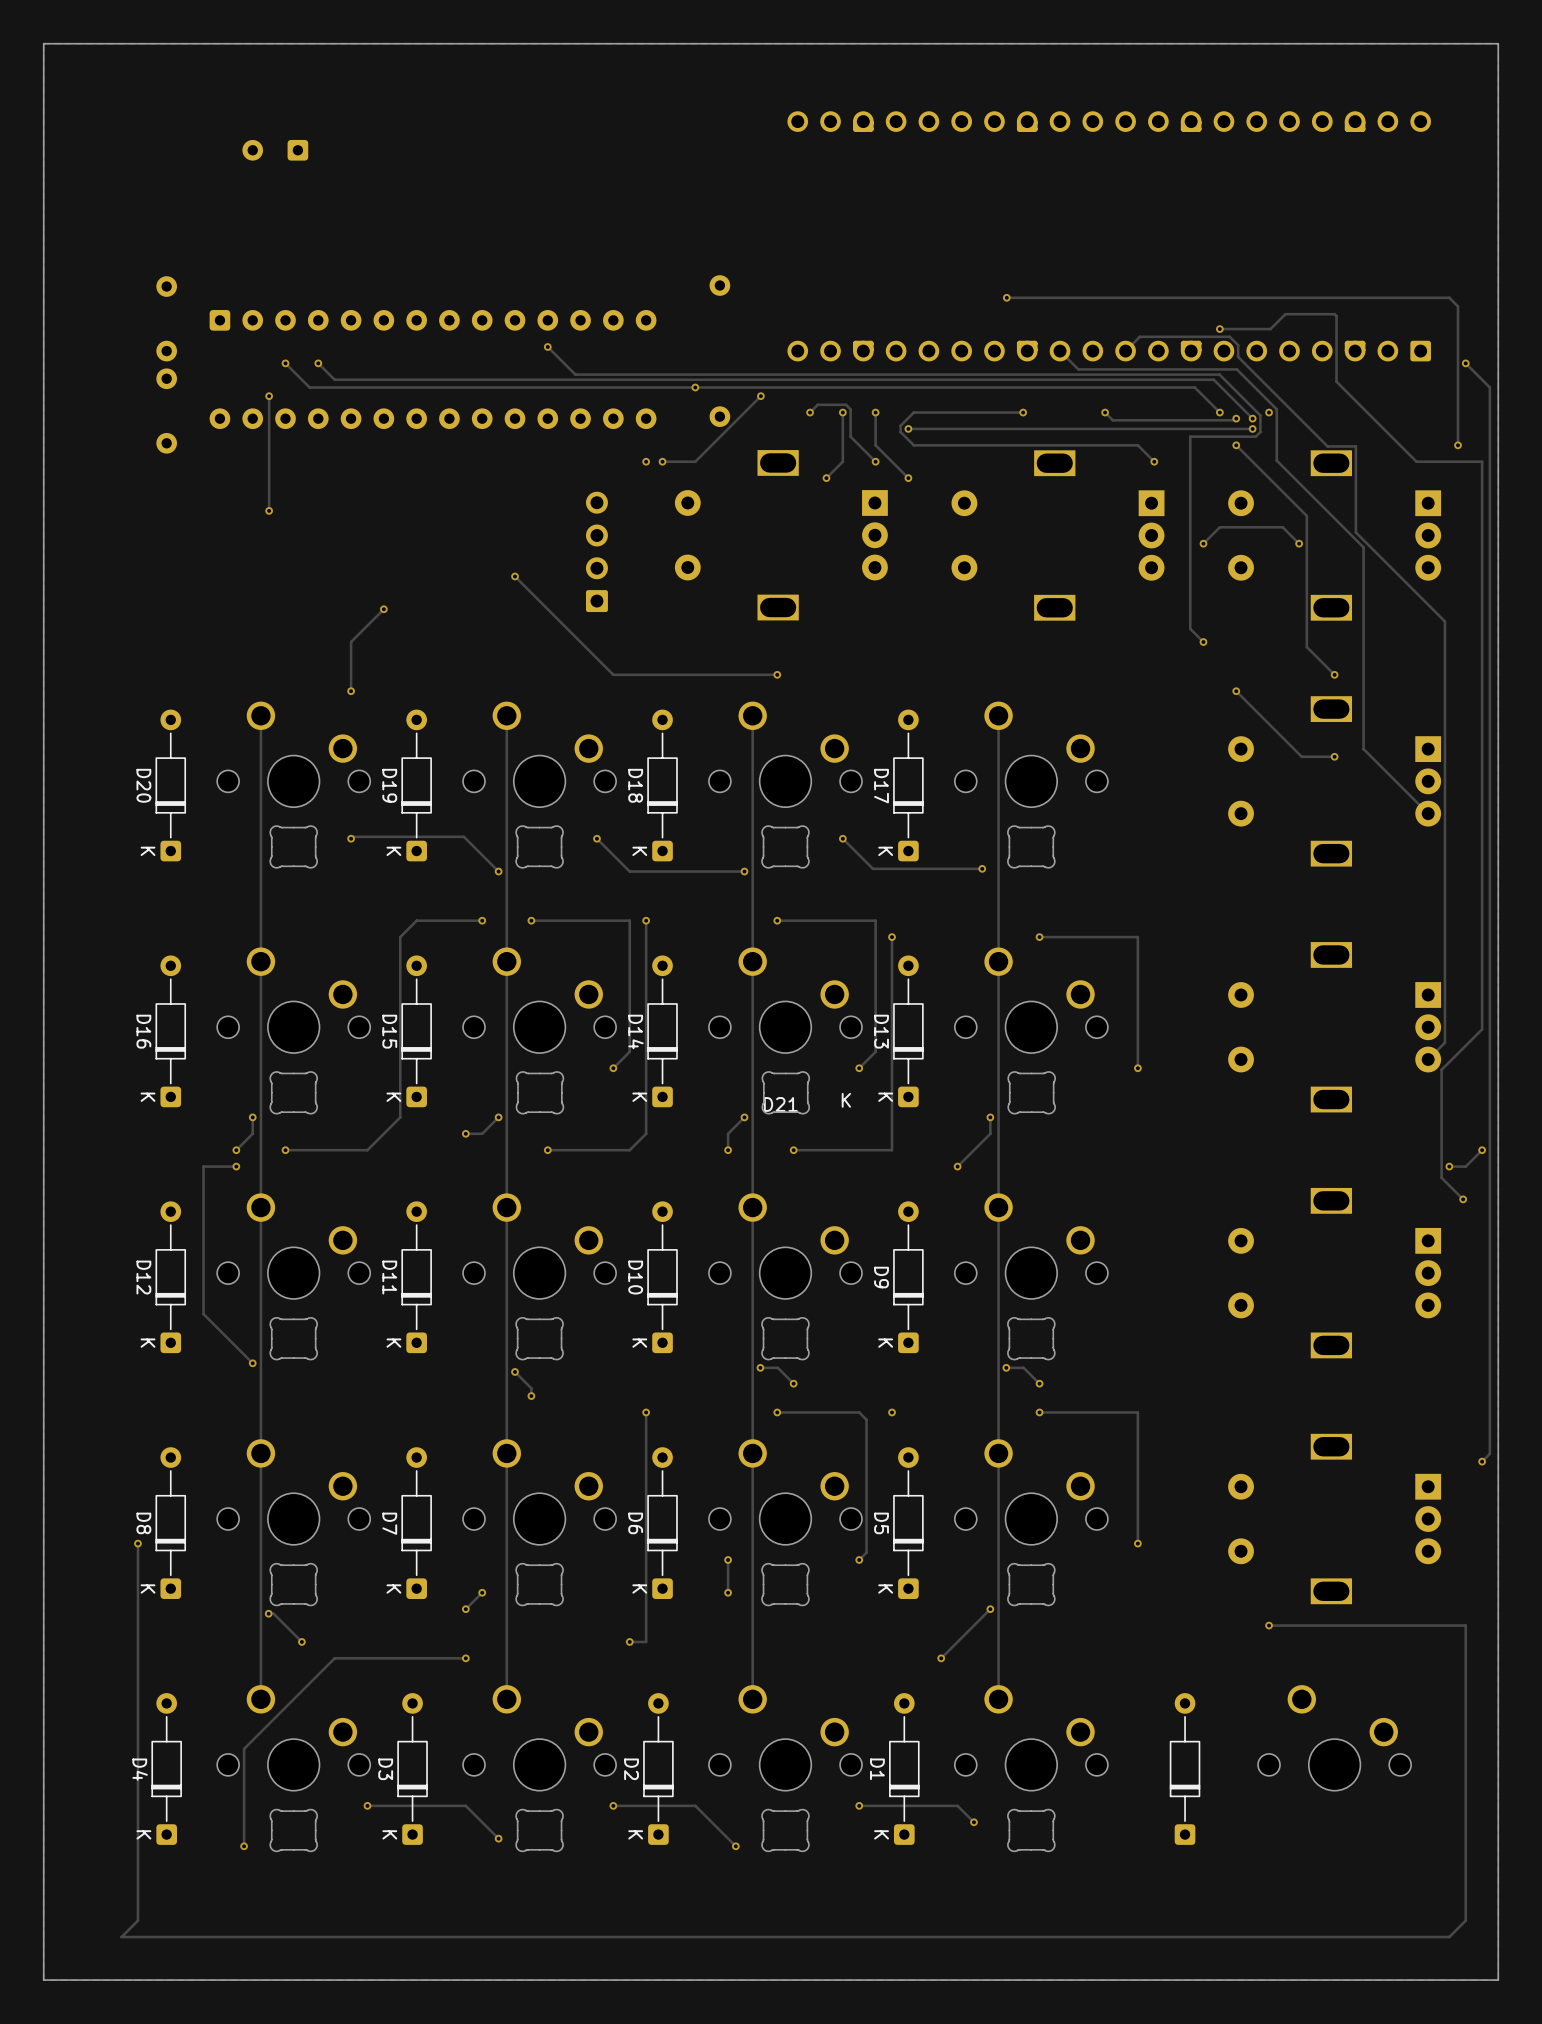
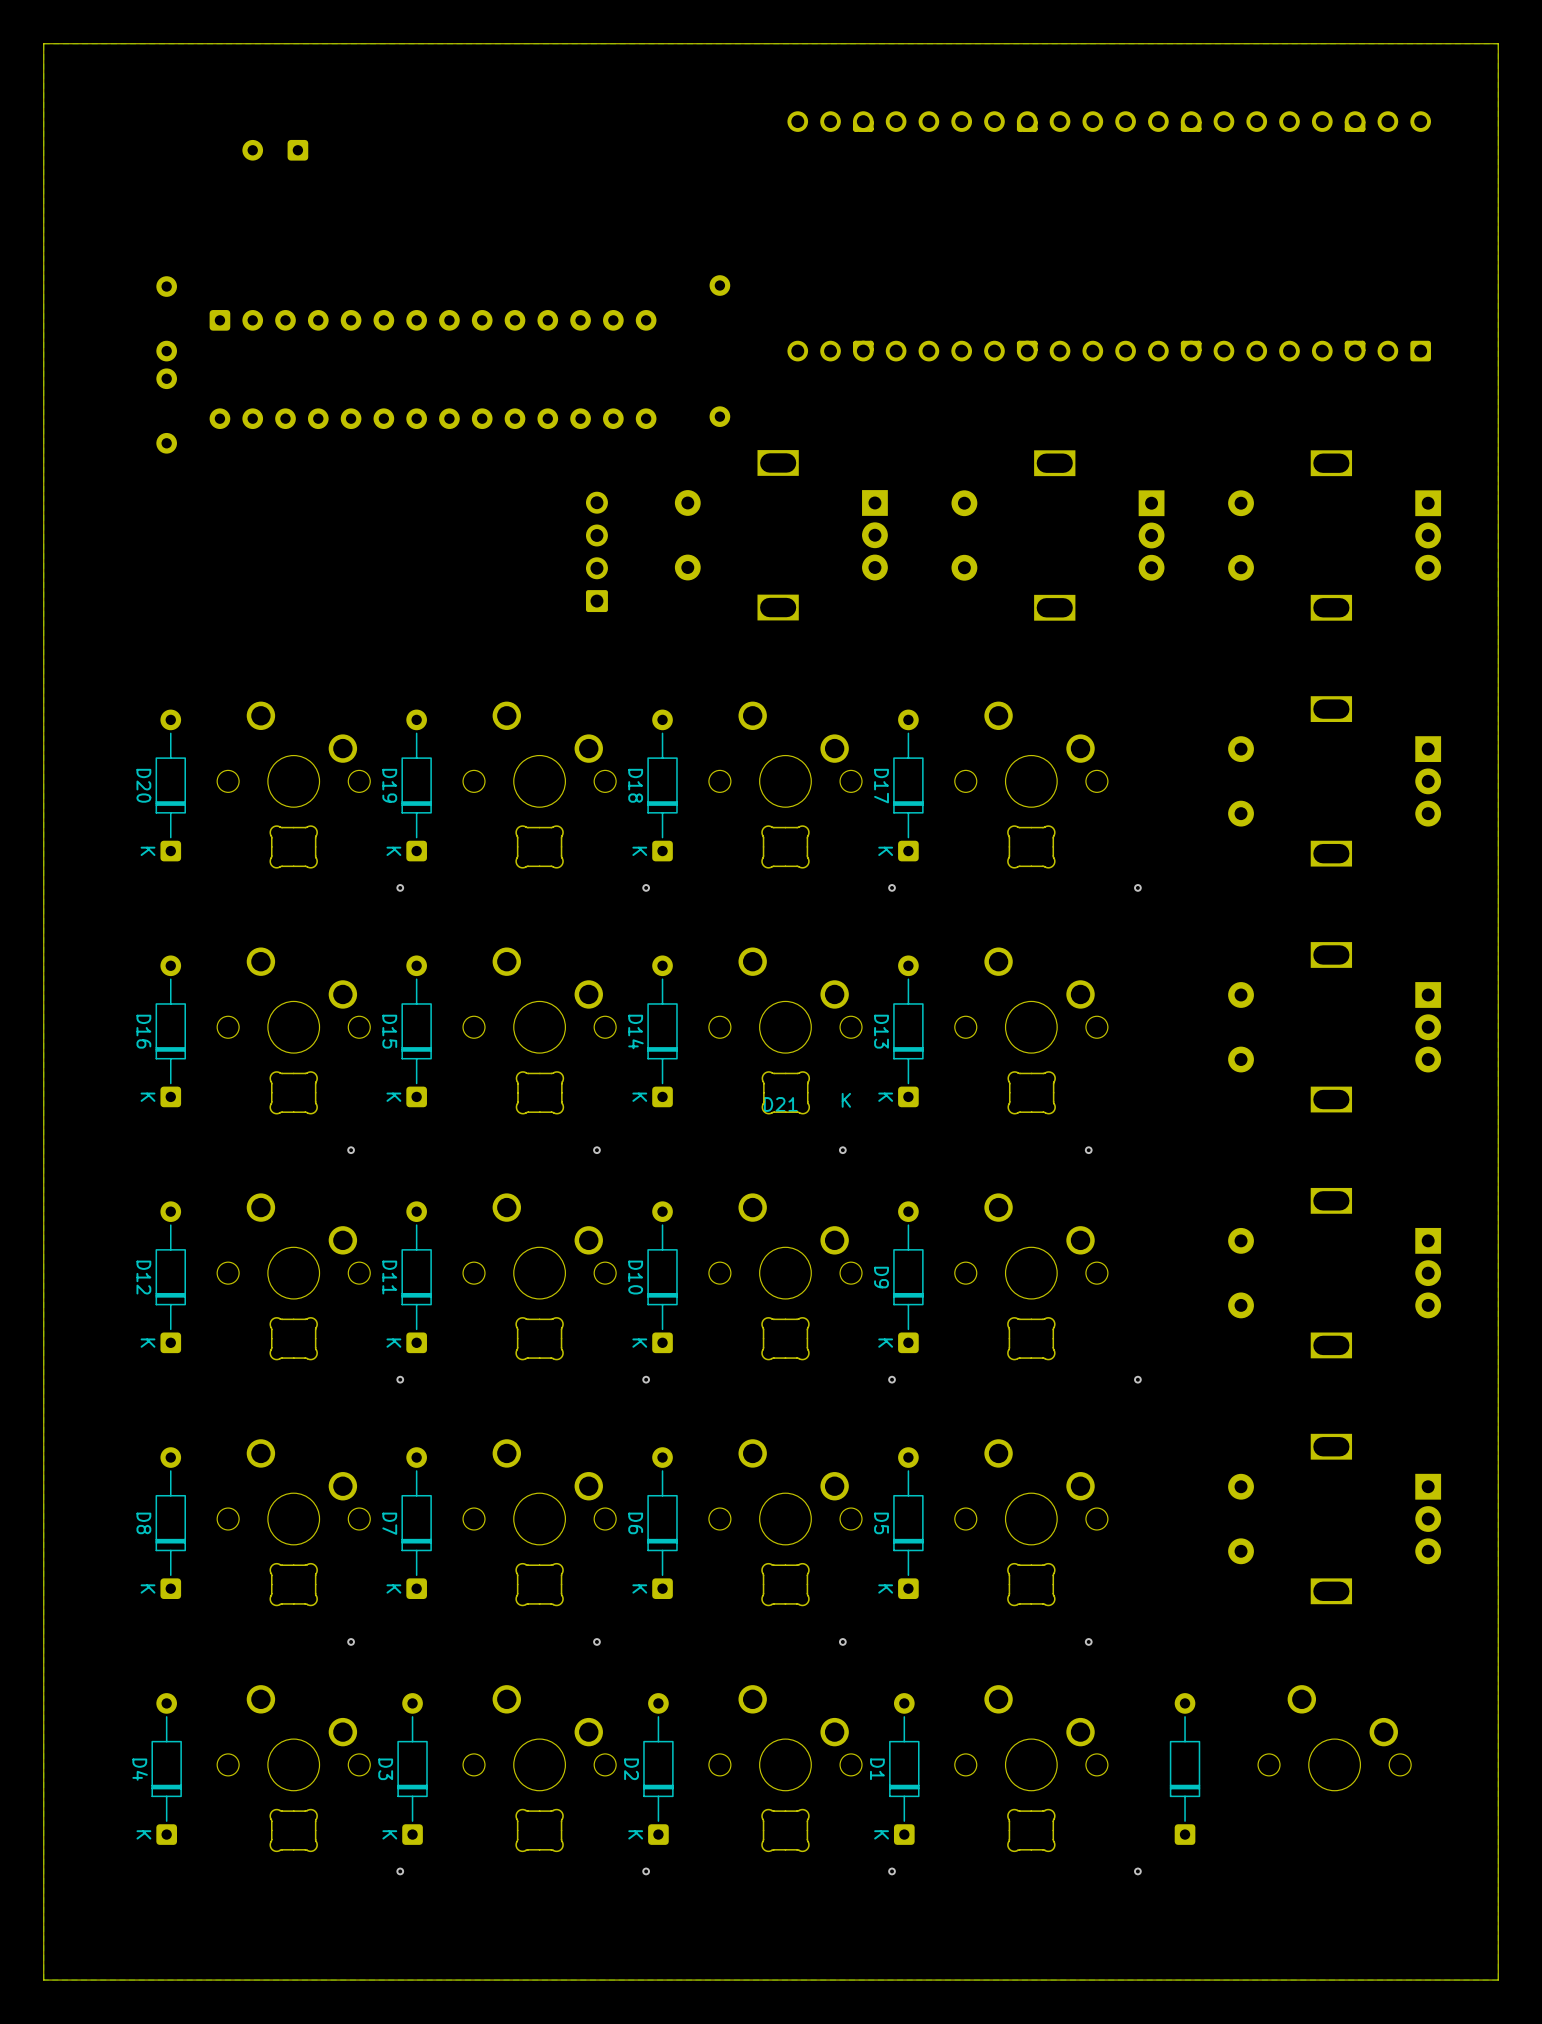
track: (1006, 297) (1449, 297) (1457, 306) (1457, 445) -> none
via: (1006, 297) -> none
track: (1219, 329) (1270, 329) (1285, 314) (1334, 314) (1336, 316) (1336, 381) (1416, 461) (1482, 461) (1482, 1029) (1441, 1069) (1441, 1177) (1463, 1199) -> none
via: (1219, 329) -> none
track: (547, 346) (575, 374) (1219, 374) (1260, 415) (1260, 432) (1255, 436) (1190, 436) (1190, 628) (1203, 642) -> none
via: (547, 346) -> none
track: (1060, 351) (1078, 369) (1236, 369) (1276, 409) (1276, 460) (1363, 547) (1363, 749) (1428, 813) -> none
track: (1125, 351) (1139, 336) (1229, 336) (1238, 345) (1238, 356) (1327, 446) (1355, 446) (1355, 532) (1444, 621) (1444, 1042) (1428, 1059) -> none
track: (285, 363) (309, 387) (1194, 387) (1219, 412) -> none
via: (285, 363) -> none
track: (318, 363) (334, 379) (1213, 379) (1252, 418) -> none
via: (318, 363) -> none
track: (1465, 363) (1489, 387) (1489, 1453) (1482, 1461) -> none
via: (1465, 363) -> none
via: (695, 387) -> none
track: (269, 396) (269, 510) -> none
via: (269, 396) -> none
track: (760, 396) (695, 461) (662, 461) -> none
via: (760, 396) -> none
track: (810, 412) (817, 404) (846, 404) (850, 409) (850, 436) (875, 461) -> none
via: (810, 412) -> none
track: (842, 412) (842, 461) (826, 478) -> none
via: (842, 412) -> none
track: (875, 412) (875, 445) (908, 478) -> none
via: (875, 412) -> none
track: (1023, 412) (913, 412) (900, 425) (900, 432) (913, 445) (1137, 445) (1154, 461) -> none
via: (1023, 412) -> none
track: (1105, 412) (1112, 420) (1234, 420) (1236, 418) -> none
via: (1105, 412) -> none
via: (1219, 412) -> none
via: (1269, 412) -> none
via: (1236, 418) -> none
via: (1252, 418) -> none
via: (908, 428) -> none
track: (1252, 428) (908, 428) -> none
via: (1252, 428) -> none
track: (1236, 445) (1306, 515) (1306, 647) (1334, 674) -> none
via: (1236, 445) -> none
via: (1457, 445) -> none
via: (646, 461) -> none
via: (662, 461) -> none
via: (875, 461) -> none
via: (1154, 461) -> none
via: (826, 478) -> none
via: (908, 478) -> none
via: (269, 510) -> none
via: (1203, 543) -> none
track: (1299, 543) (1282, 527) (1219, 527) (1203, 543) -> none
via: (1299, 543) -> none
track: (515, 576) (613, 674) (777, 674) -> none
via: (515, 576) -> none
track: (383, 609) (351, 642) (351, 691) -> none
via: (383, 609) -> none
via: (1203, 642) -> none
via: (777, 674) -> none
via: (1334, 674) -> none
via: (351, 691) -> none
track: (1236, 691) (1301, 756) (1334, 756) -> none
via: (1236, 691) -> none
track: (260, 714) (260, 1699) -> none
track: (506, 715) (506, 1699) -> none
track: (752, 715) (752, 1699) -> none
track: (998, 715) (998, 1699) -> none
via: (1334, 756) -> none
track: (351, 838) (352, 836) (463, 836) (498, 871) -> none
via: (351, 838) -> none
track: (596, 838) (629, 871) (744, 871) -> none
via: (596, 838) -> none
track: (842, 838) (872, 868) (982, 868) -> none
via: (842, 838) -> none
via: (982, 868) -> none
via: (498, 871) -> none
via: (744, 871) -> none
via: none -> (400, 887)
via: none -> (892, 887)
via: none -> (1137, 887)
track: (482, 920) (416, 920) (400, 937) (400, 1117) (367, 1150) (285, 1150) -> none
via: (482, 920) -> none
track: (531, 920) (629, 920) (629, 1051) (613, 1068) -> none
via: (531, 920) -> none
track: (646, 920) (646, 1133) (629, 1150) (547, 1150) -> none
via position: (646, 920) -> (646, 887)
track: (777, 920) (875, 920) (875, 1051) (859, 1068) -> none
via: (777, 920) -> none
track: (892, 937) (892, 1150) (793, 1150) -> none
via: (892, 937) -> none
track: (1039, 937) (1137, 937) (1137, 1068) -> none
via: (1039, 937) -> none
via: (613, 1068) -> none
via: (859, 1068) -> none
via: (1137, 1068) -> none
track: (252, 1117) (252, 1133) (236, 1150) -> none
via: (252, 1117) -> none
track: (498, 1117) (482, 1133) (465, 1133) -> none
via: (498, 1117) -> none
track: (744, 1117) (728, 1133) (728, 1150) -> none
via: (744, 1117) -> none
track: (990, 1117) (990, 1133) (957, 1166) -> none
via: (990, 1117) -> none
via: (465, 1133) -> none
via: (236, 1150) -> none
via: (285, 1150) -> none
via: none -> (351, 1150)
via: (547, 1150) -> none
via: none -> (596, 1150)
via: (728, 1150) -> none
via: (793, 1150) -> none
via: none -> (842, 1150)
via: none -> (1088, 1150)
track: (1482, 1150) (1465, 1166) (1449, 1166) -> none
via: (1482, 1150) -> none
track: (236, 1166) (203, 1166) (203, 1314) (252, 1363) -> none
via: (236, 1166) -> none
via: (957, 1166) -> none
via: (1449, 1166) -> none
via: (1463, 1199) -> none
via: (252, 1363) -> none
track: (760, 1367) (777, 1367) (793, 1383) -> none
via: (760, 1367) -> none
track: (1006, 1367) (1023, 1367) (1039, 1383) -> none
via: (1006, 1367) -> none
track: (515, 1371) (531, 1388) (531, 1396) -> none
via: (515, 1371) -> none
via: none -> (400, 1379)
via: none -> (1137, 1379)
via: (793, 1383) -> none
via: (1039, 1383) -> none
via: (531, 1396) -> none
track: (646, 1412) (646, 1641) (629, 1641) -> none
via position: (646, 1412) -> (646, 1379)
track: (777, 1412) (859, 1412) (866, 1419) (866, 1552) (859, 1559) -> none
via: (777, 1412) -> none
via position: (892, 1412) -> (892, 1379)
track: (1039, 1412) (1137, 1412) (1137, 1543) -> none
via: (1039, 1412) -> none
via: (1482, 1461) -> none
track: (137, 1543) (137, 1920) (121, 1937) (1449, 1937) (1465, 1920) (1465, 1625) (1269, 1625) -> none
via: (137, 1543) -> none
via: (1137, 1543) -> none
track: (728, 1559) (728, 1592) -> none
via: (728, 1559) -> none
via: (859, 1559) -> none
track: (482, 1592) (465, 1609) -> none
via: (482, 1592) -> none
via: (728, 1592) -> none
via: (465, 1609) -> none
track: (990, 1609) (941, 1658) -> none
via: (990, 1609) -> none
track: (268, 1613) (273, 1613) (301, 1641) -> none
via: (268, 1613) -> none
via: (1269, 1625) -> none
via: (301, 1641) -> none
via: none -> (351, 1641)
via position: (629, 1641) -> (596, 1641)
via: none -> (842, 1641)
via: none -> (1088, 1641)
track: (465, 1658) (334, 1658) (244, 1748) (244, 1846) -> none
via: (465, 1658) -> none
via: (941, 1658) -> none
track: (367, 1805) (465, 1805) (498, 1838) -> none
via: (367, 1805) -> none
track: (613, 1805) (695, 1805) (735, 1846) -> none
via: (613, 1805) -> none
track: (859, 1805) (957, 1805) (973, 1822) -> none
via: (859, 1805) -> none
via: (973, 1822) -> none
via: (498, 1838) -> none
via: (244, 1846) -> none
via: (735, 1846) -> none
via: none -> (400, 1871)
via: none -> (646, 1871)
via: none -> (892, 1871)
via: none -> (1137, 1871)

